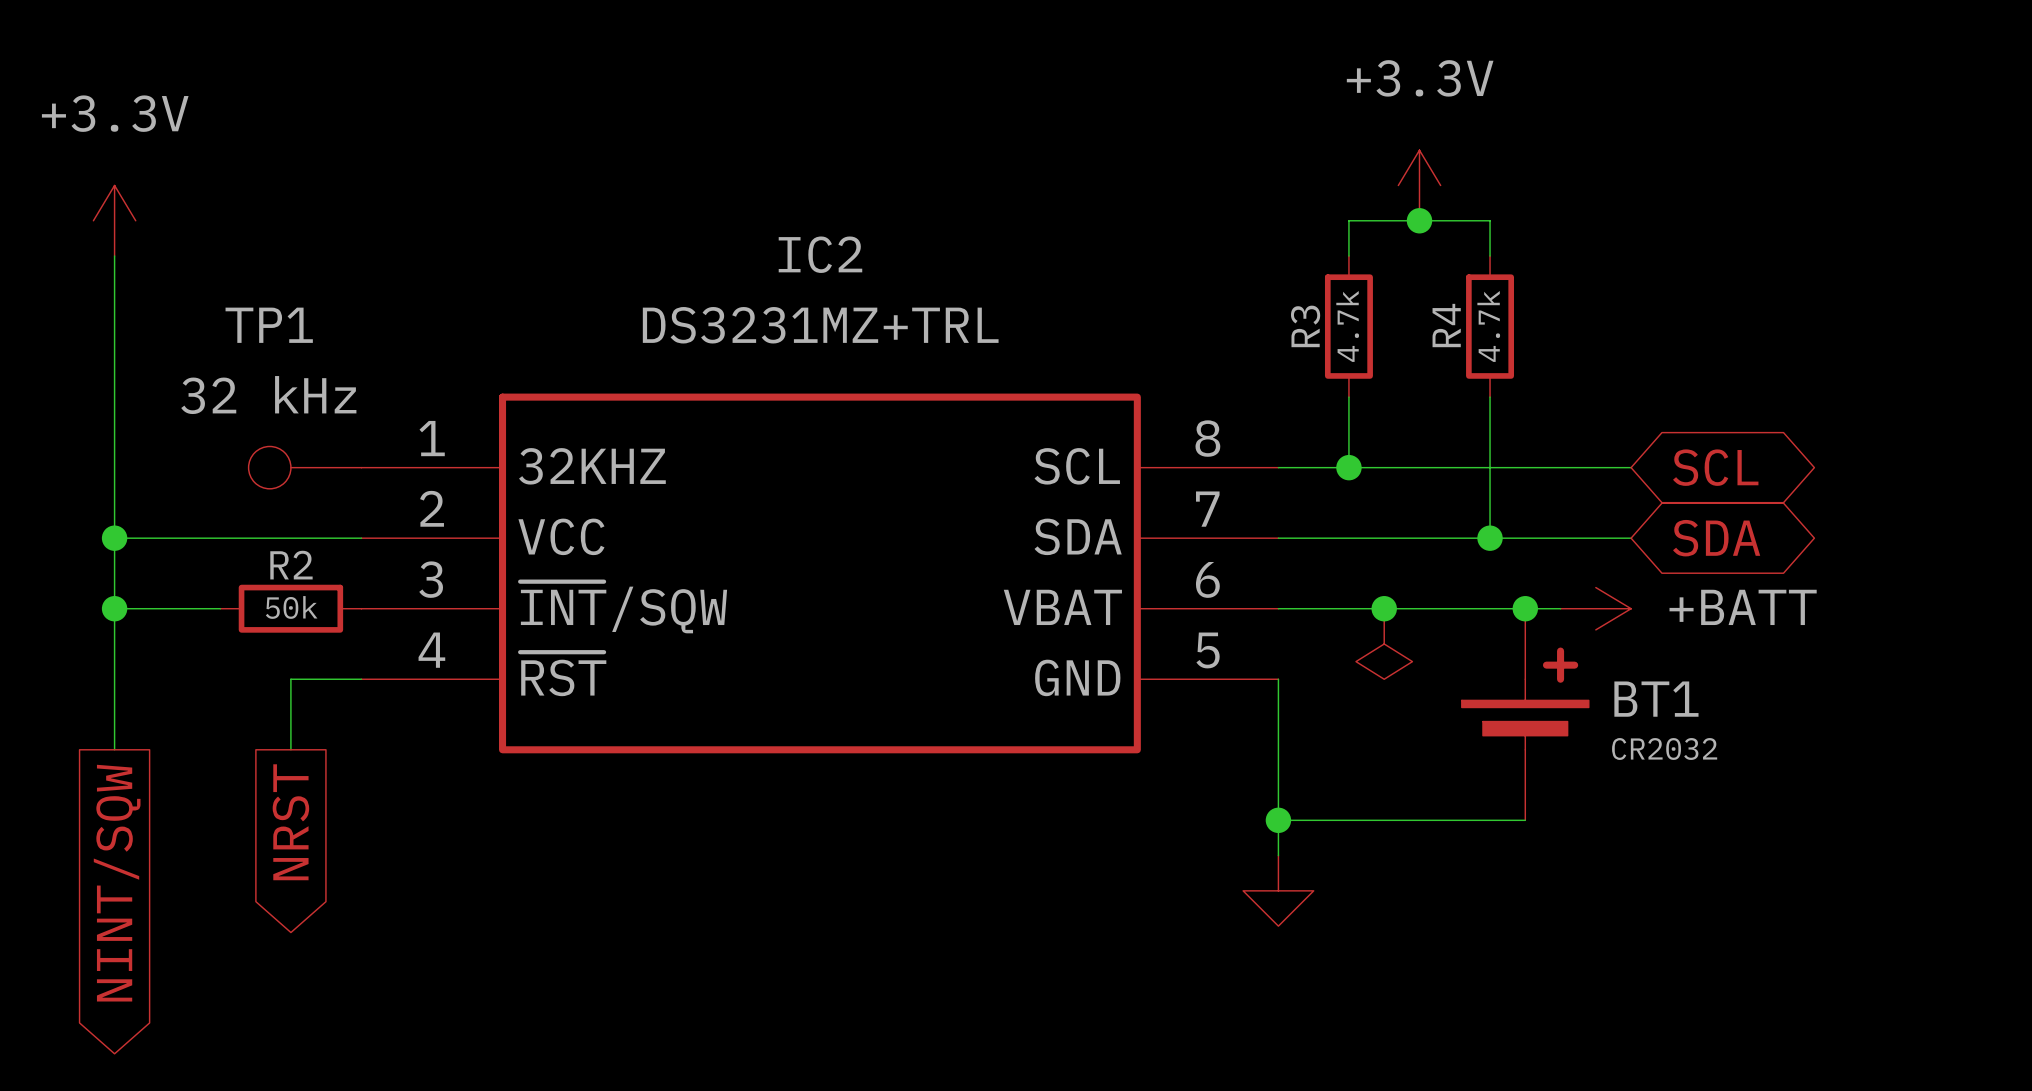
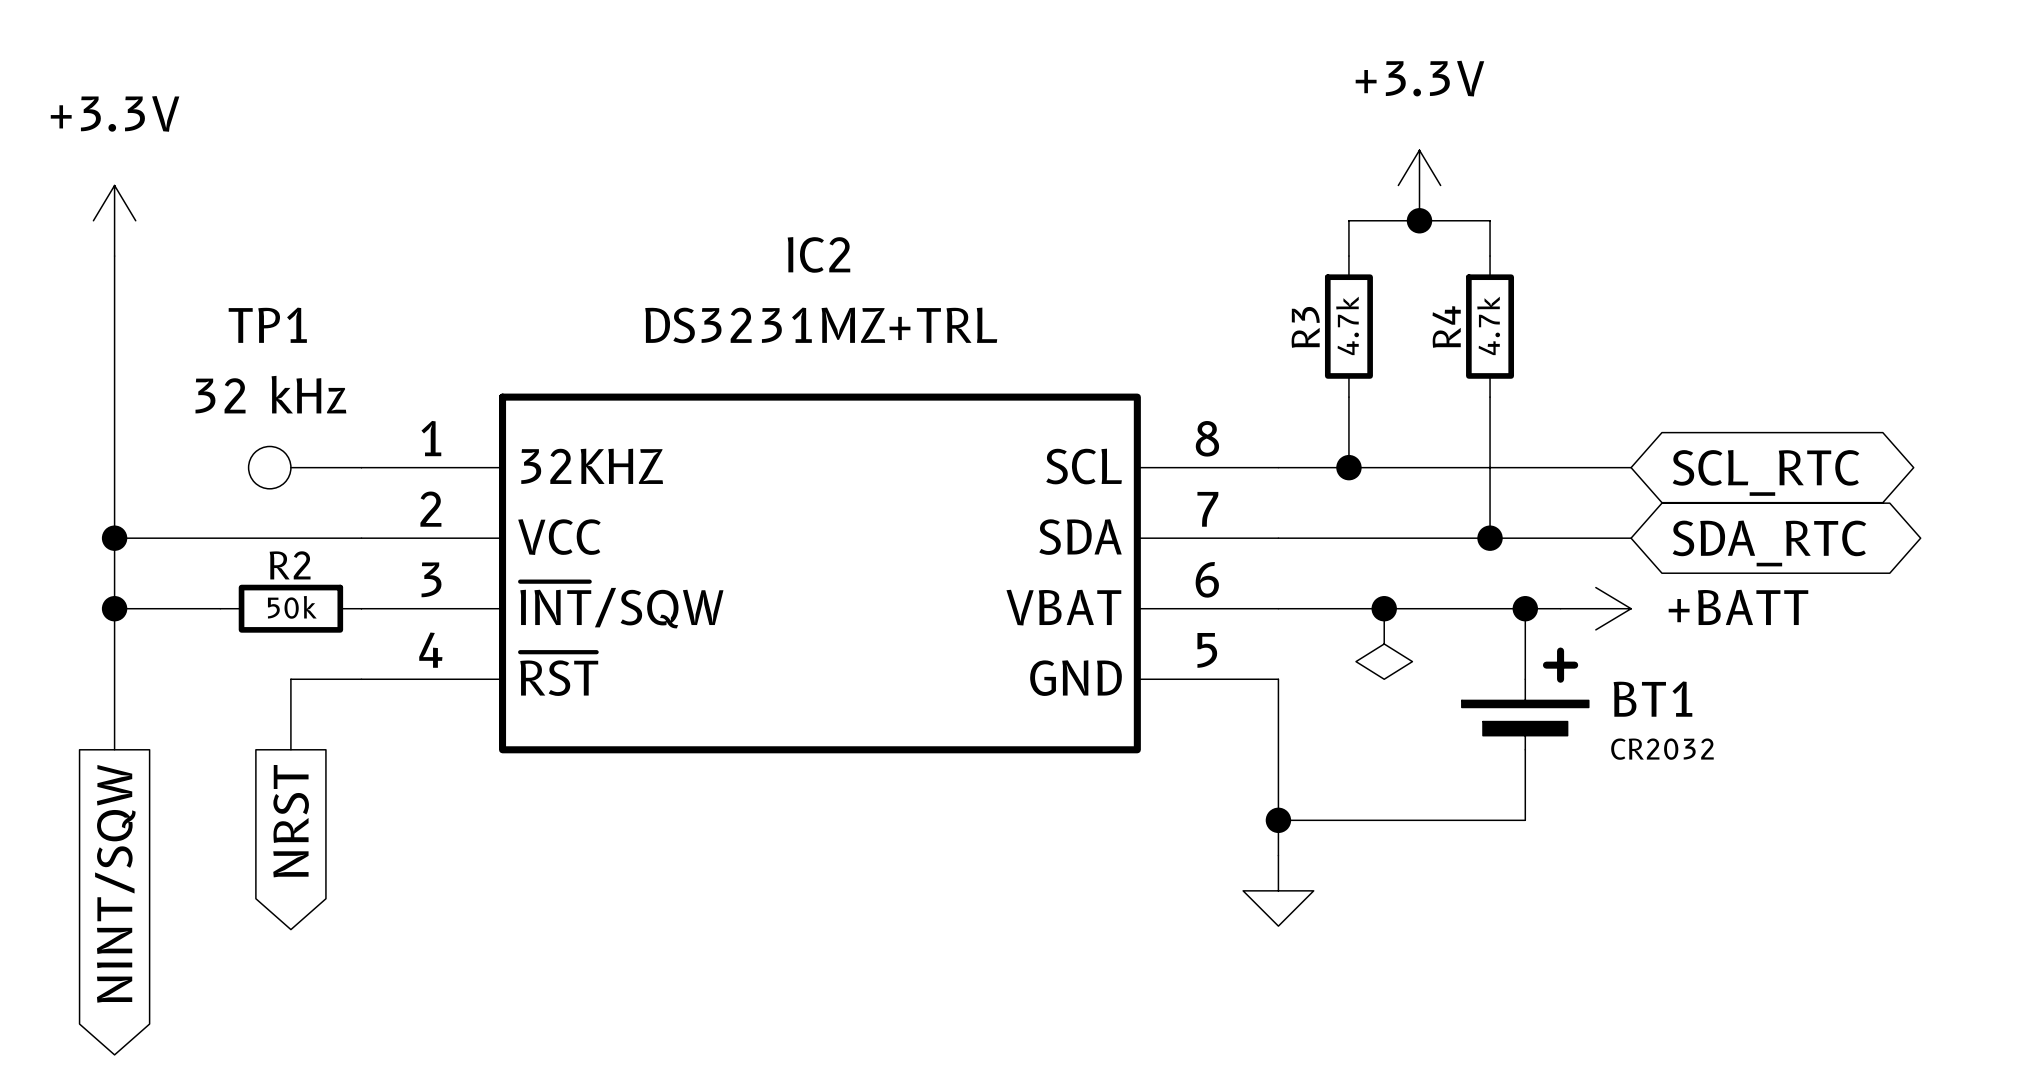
global label: SCL (1715, 467) -> SCL_RTC (1765, 472)
global label: SDA (1716, 538) -> SDA_RTC (1769, 543)

